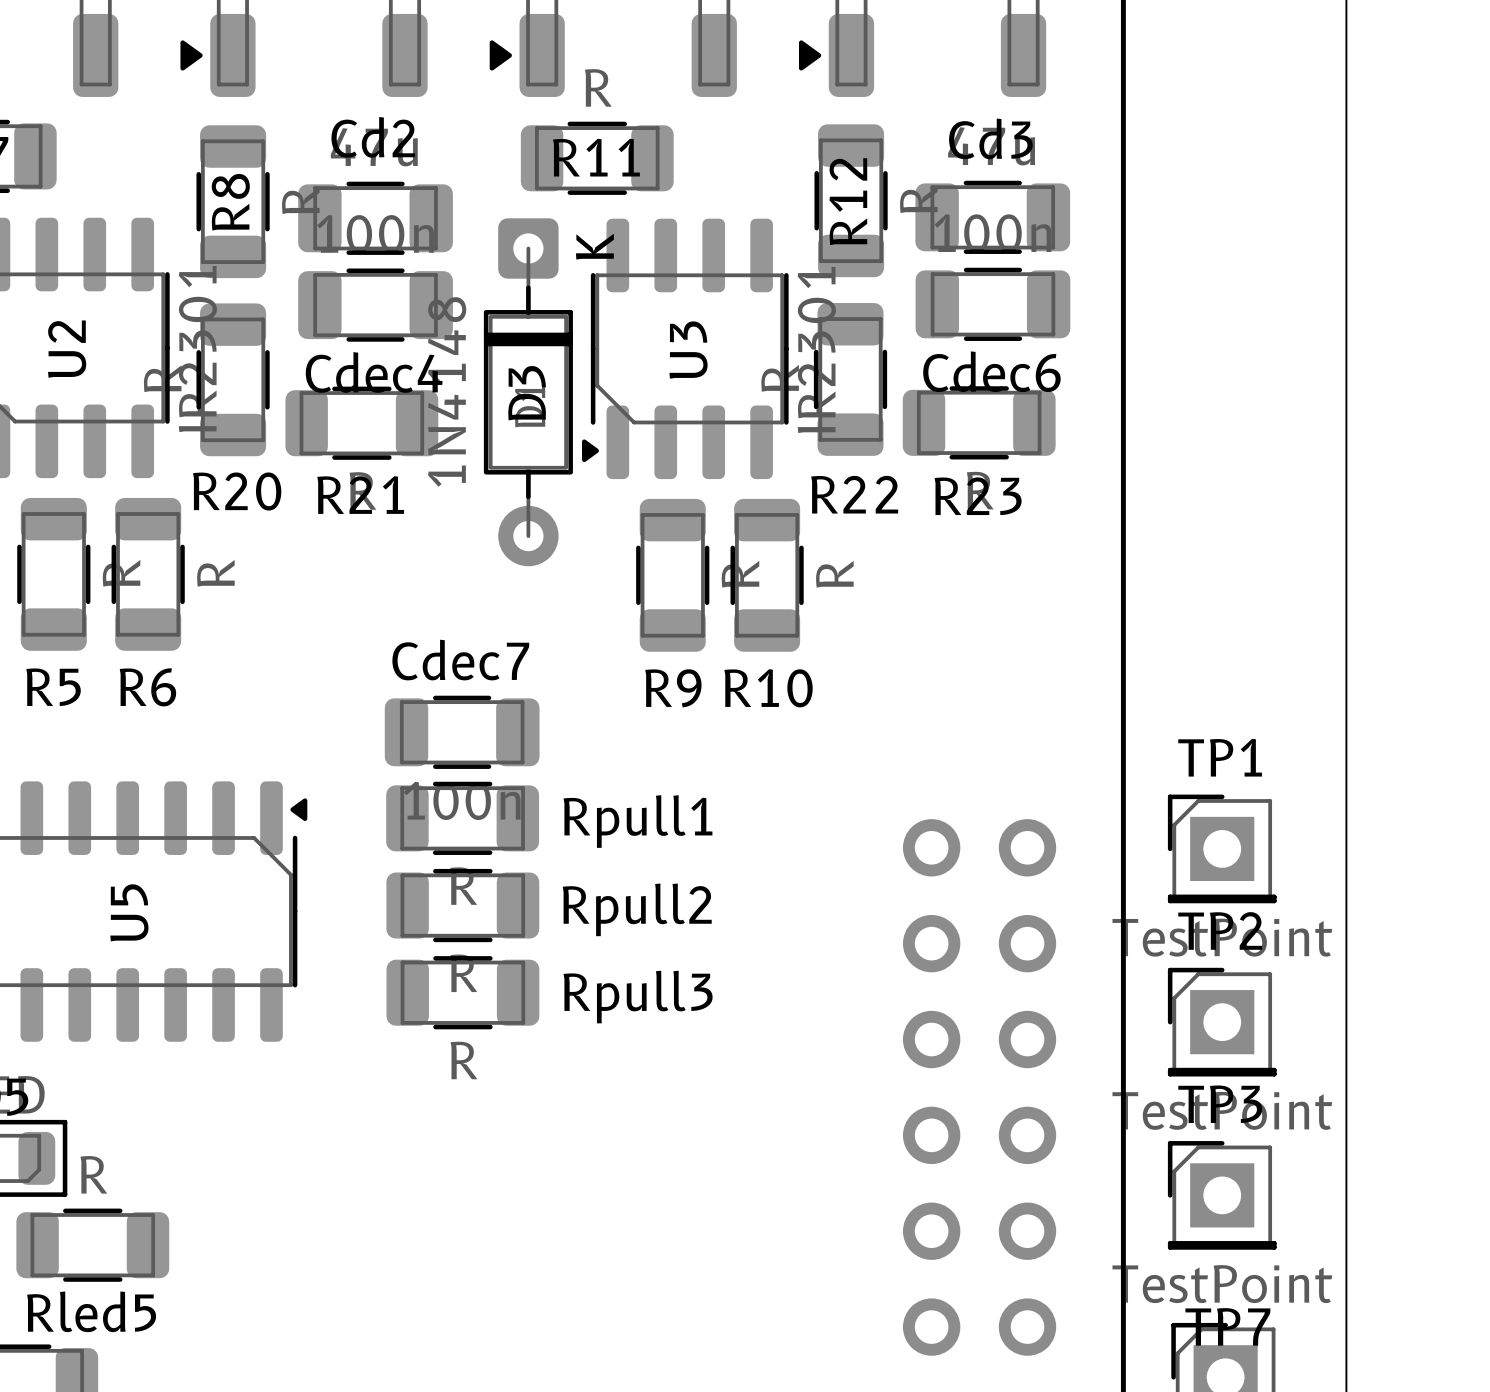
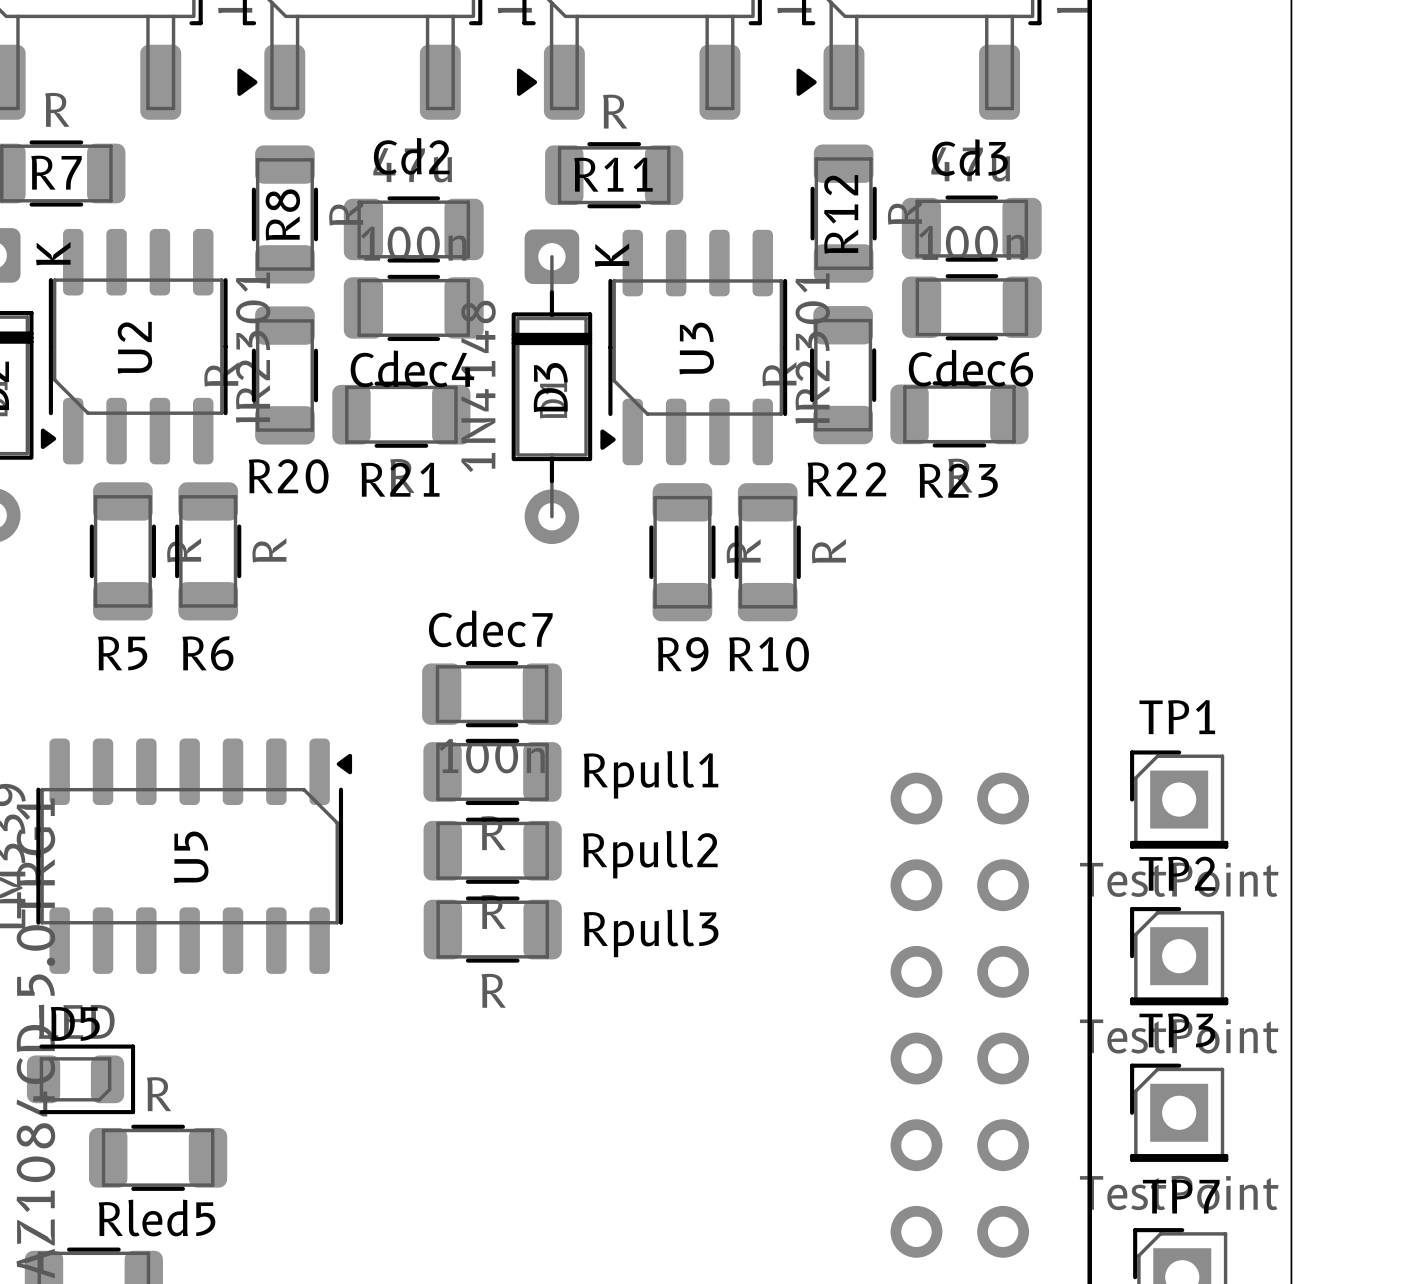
TP7 name position: TP7 (1227, 1326) -> TP7 (1181, 1196)

